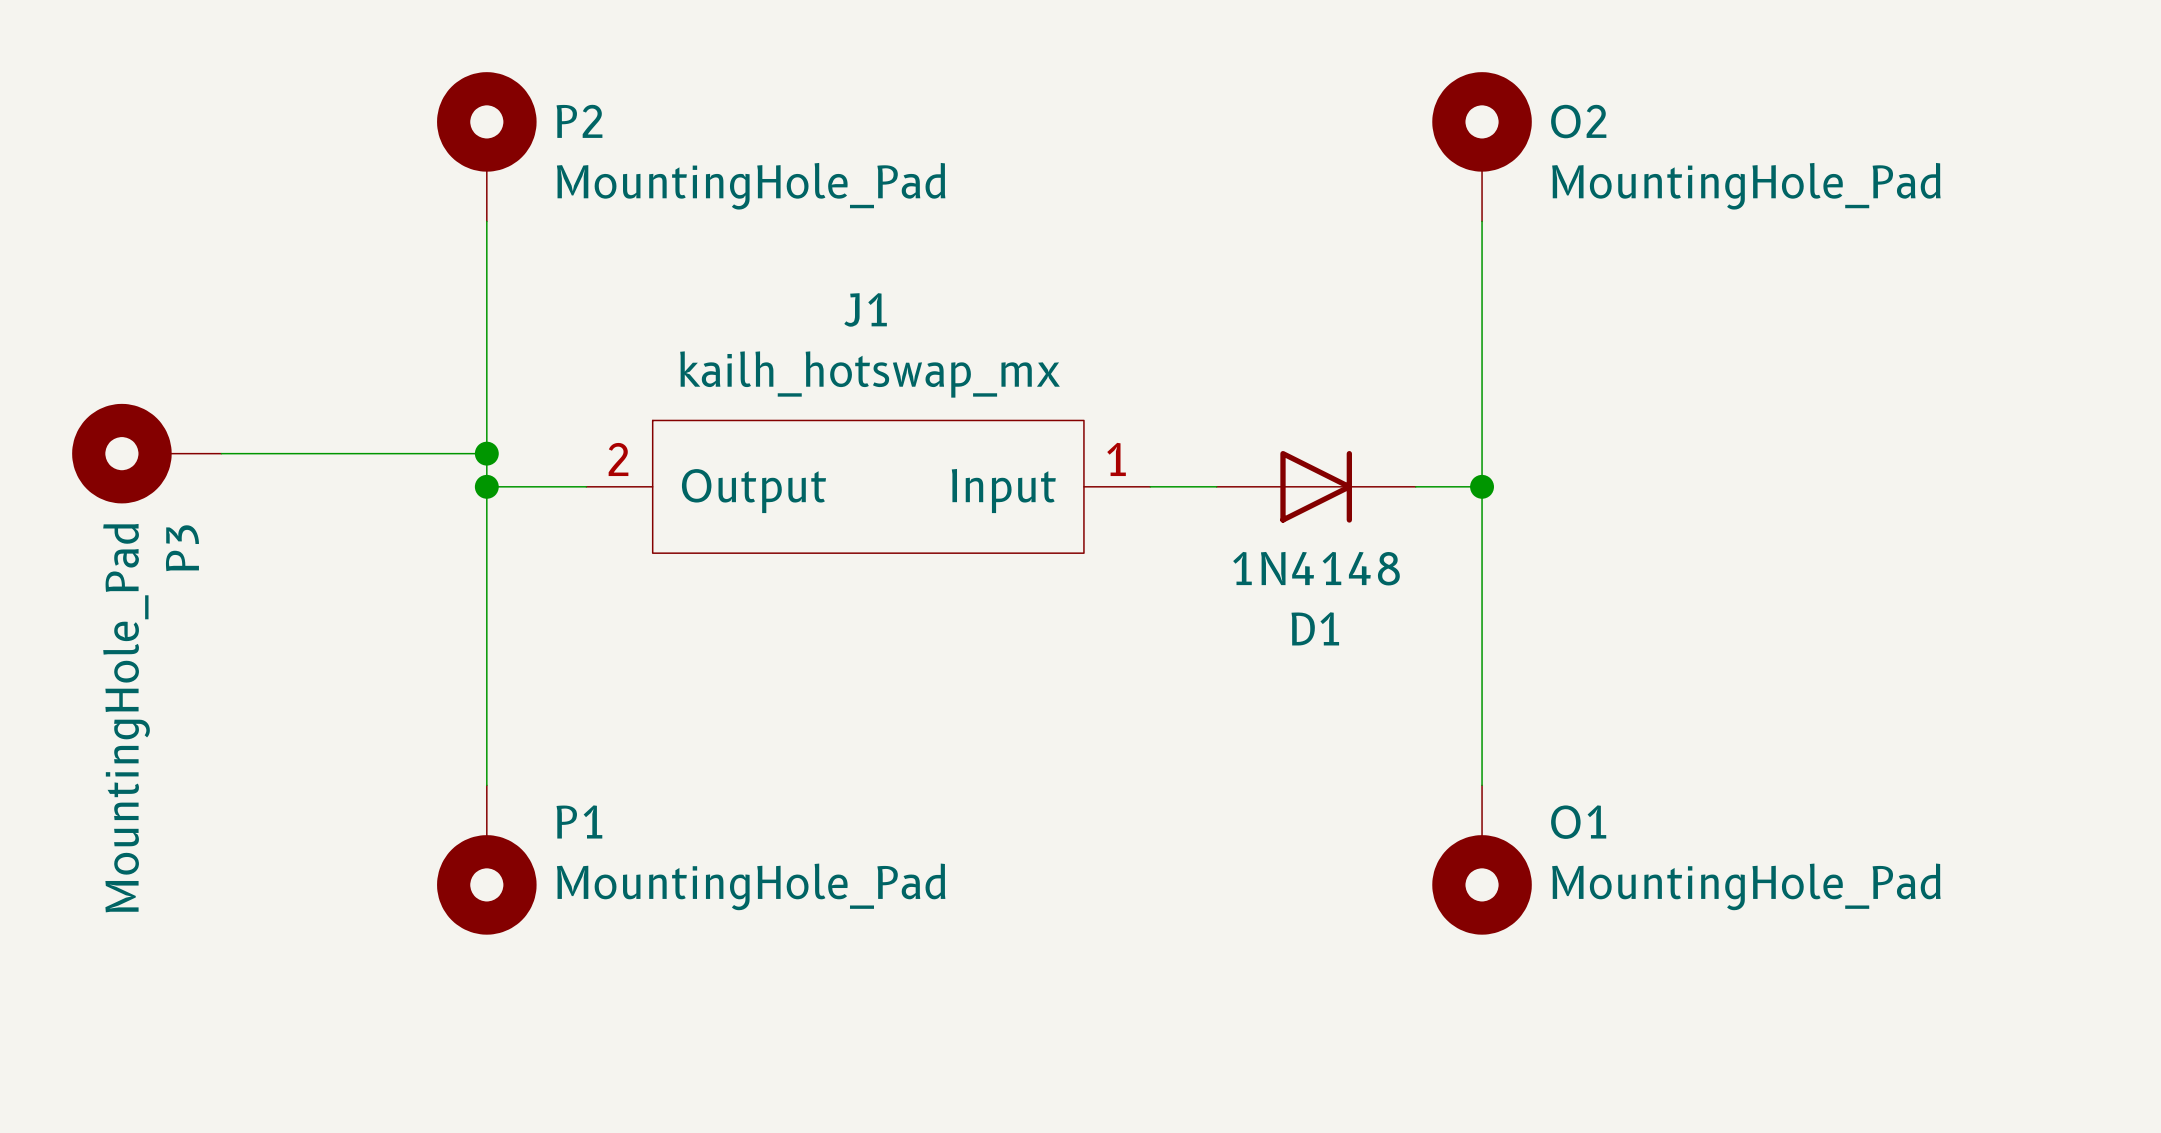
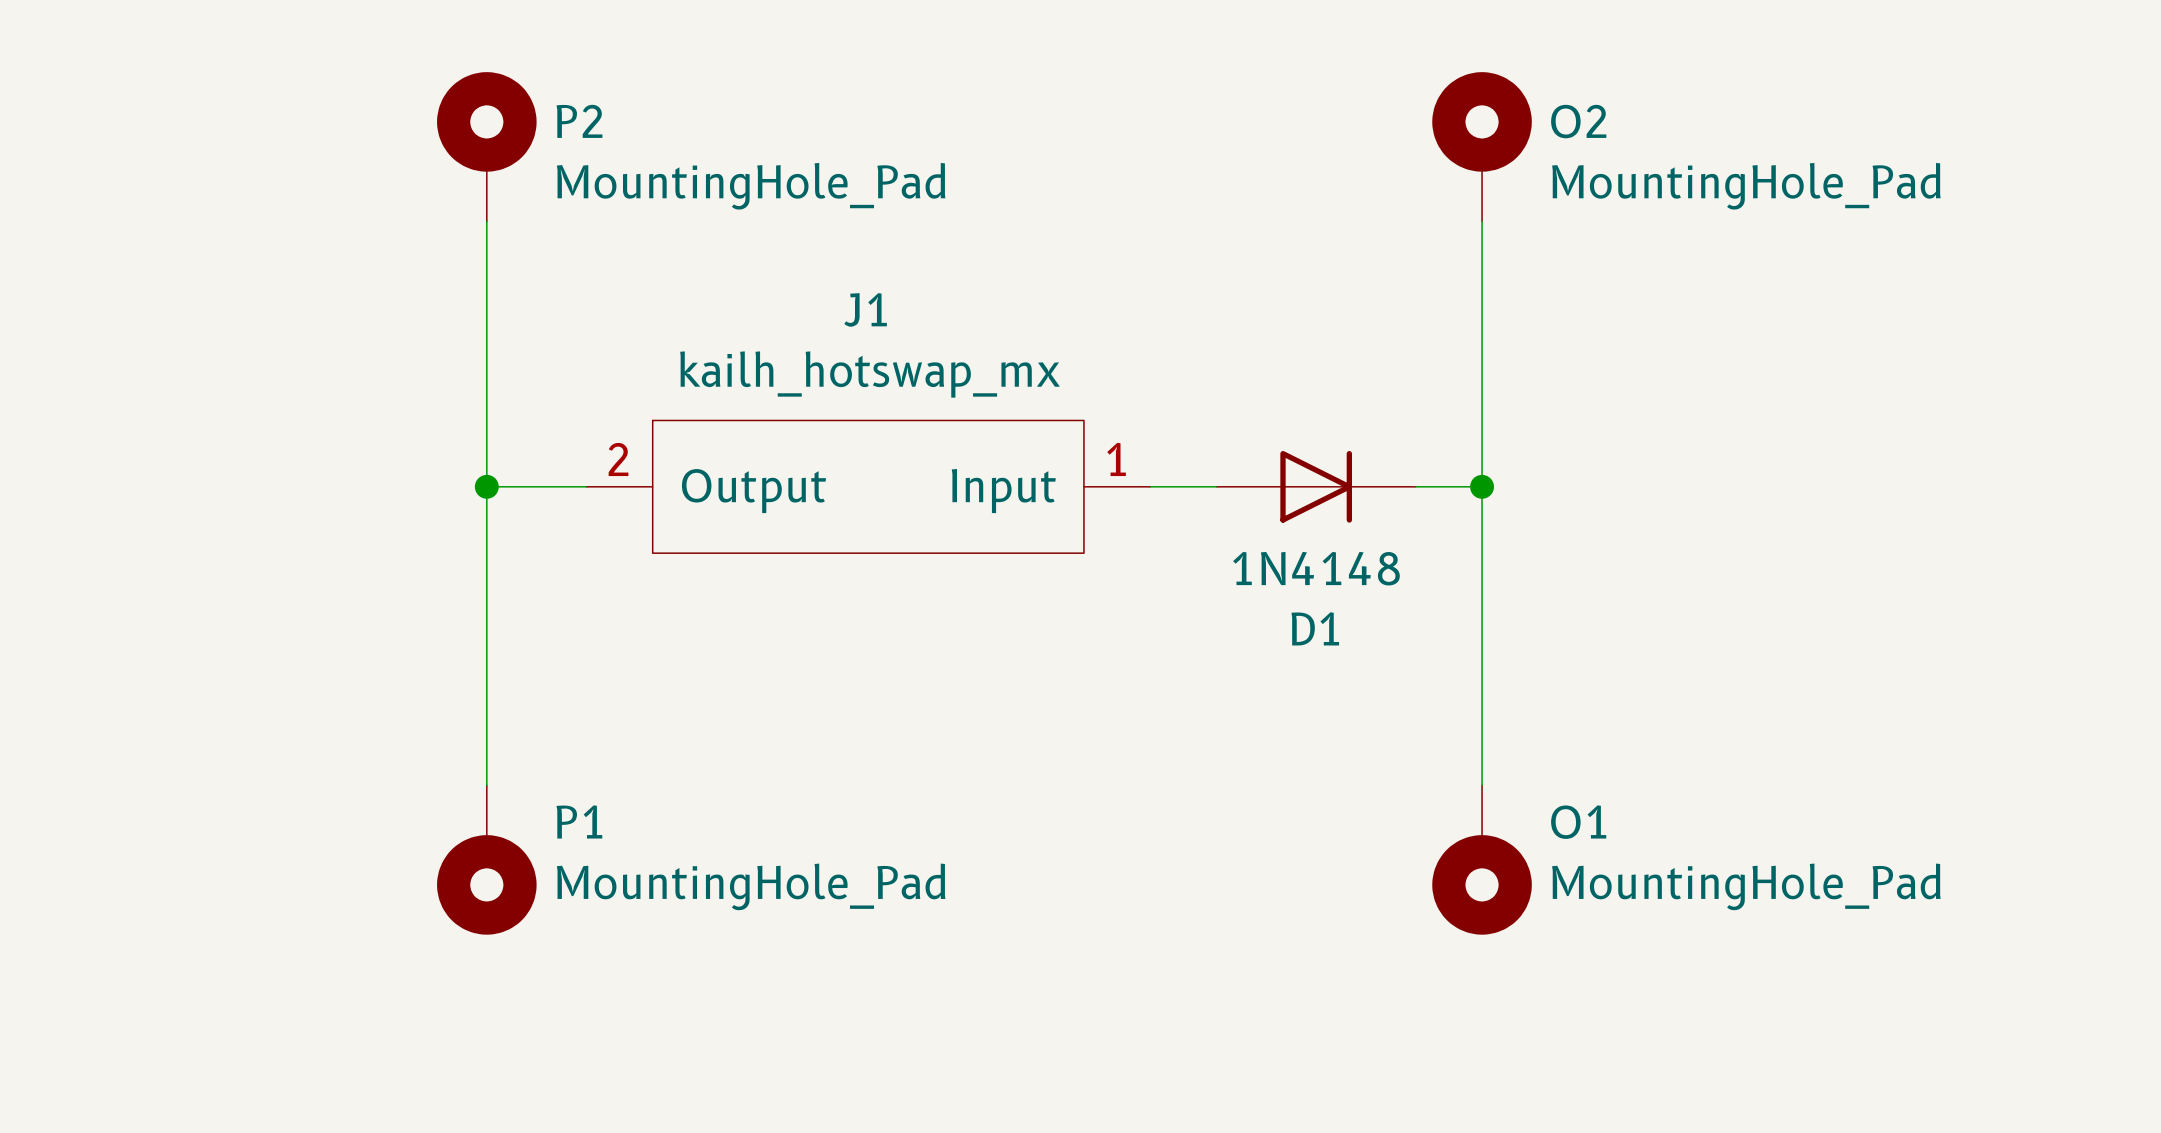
P3: MountingHole_Pad (146, 453) -> none
wire: (221, 453) (486, 453) -> none
junction: (486, 453) -> none

